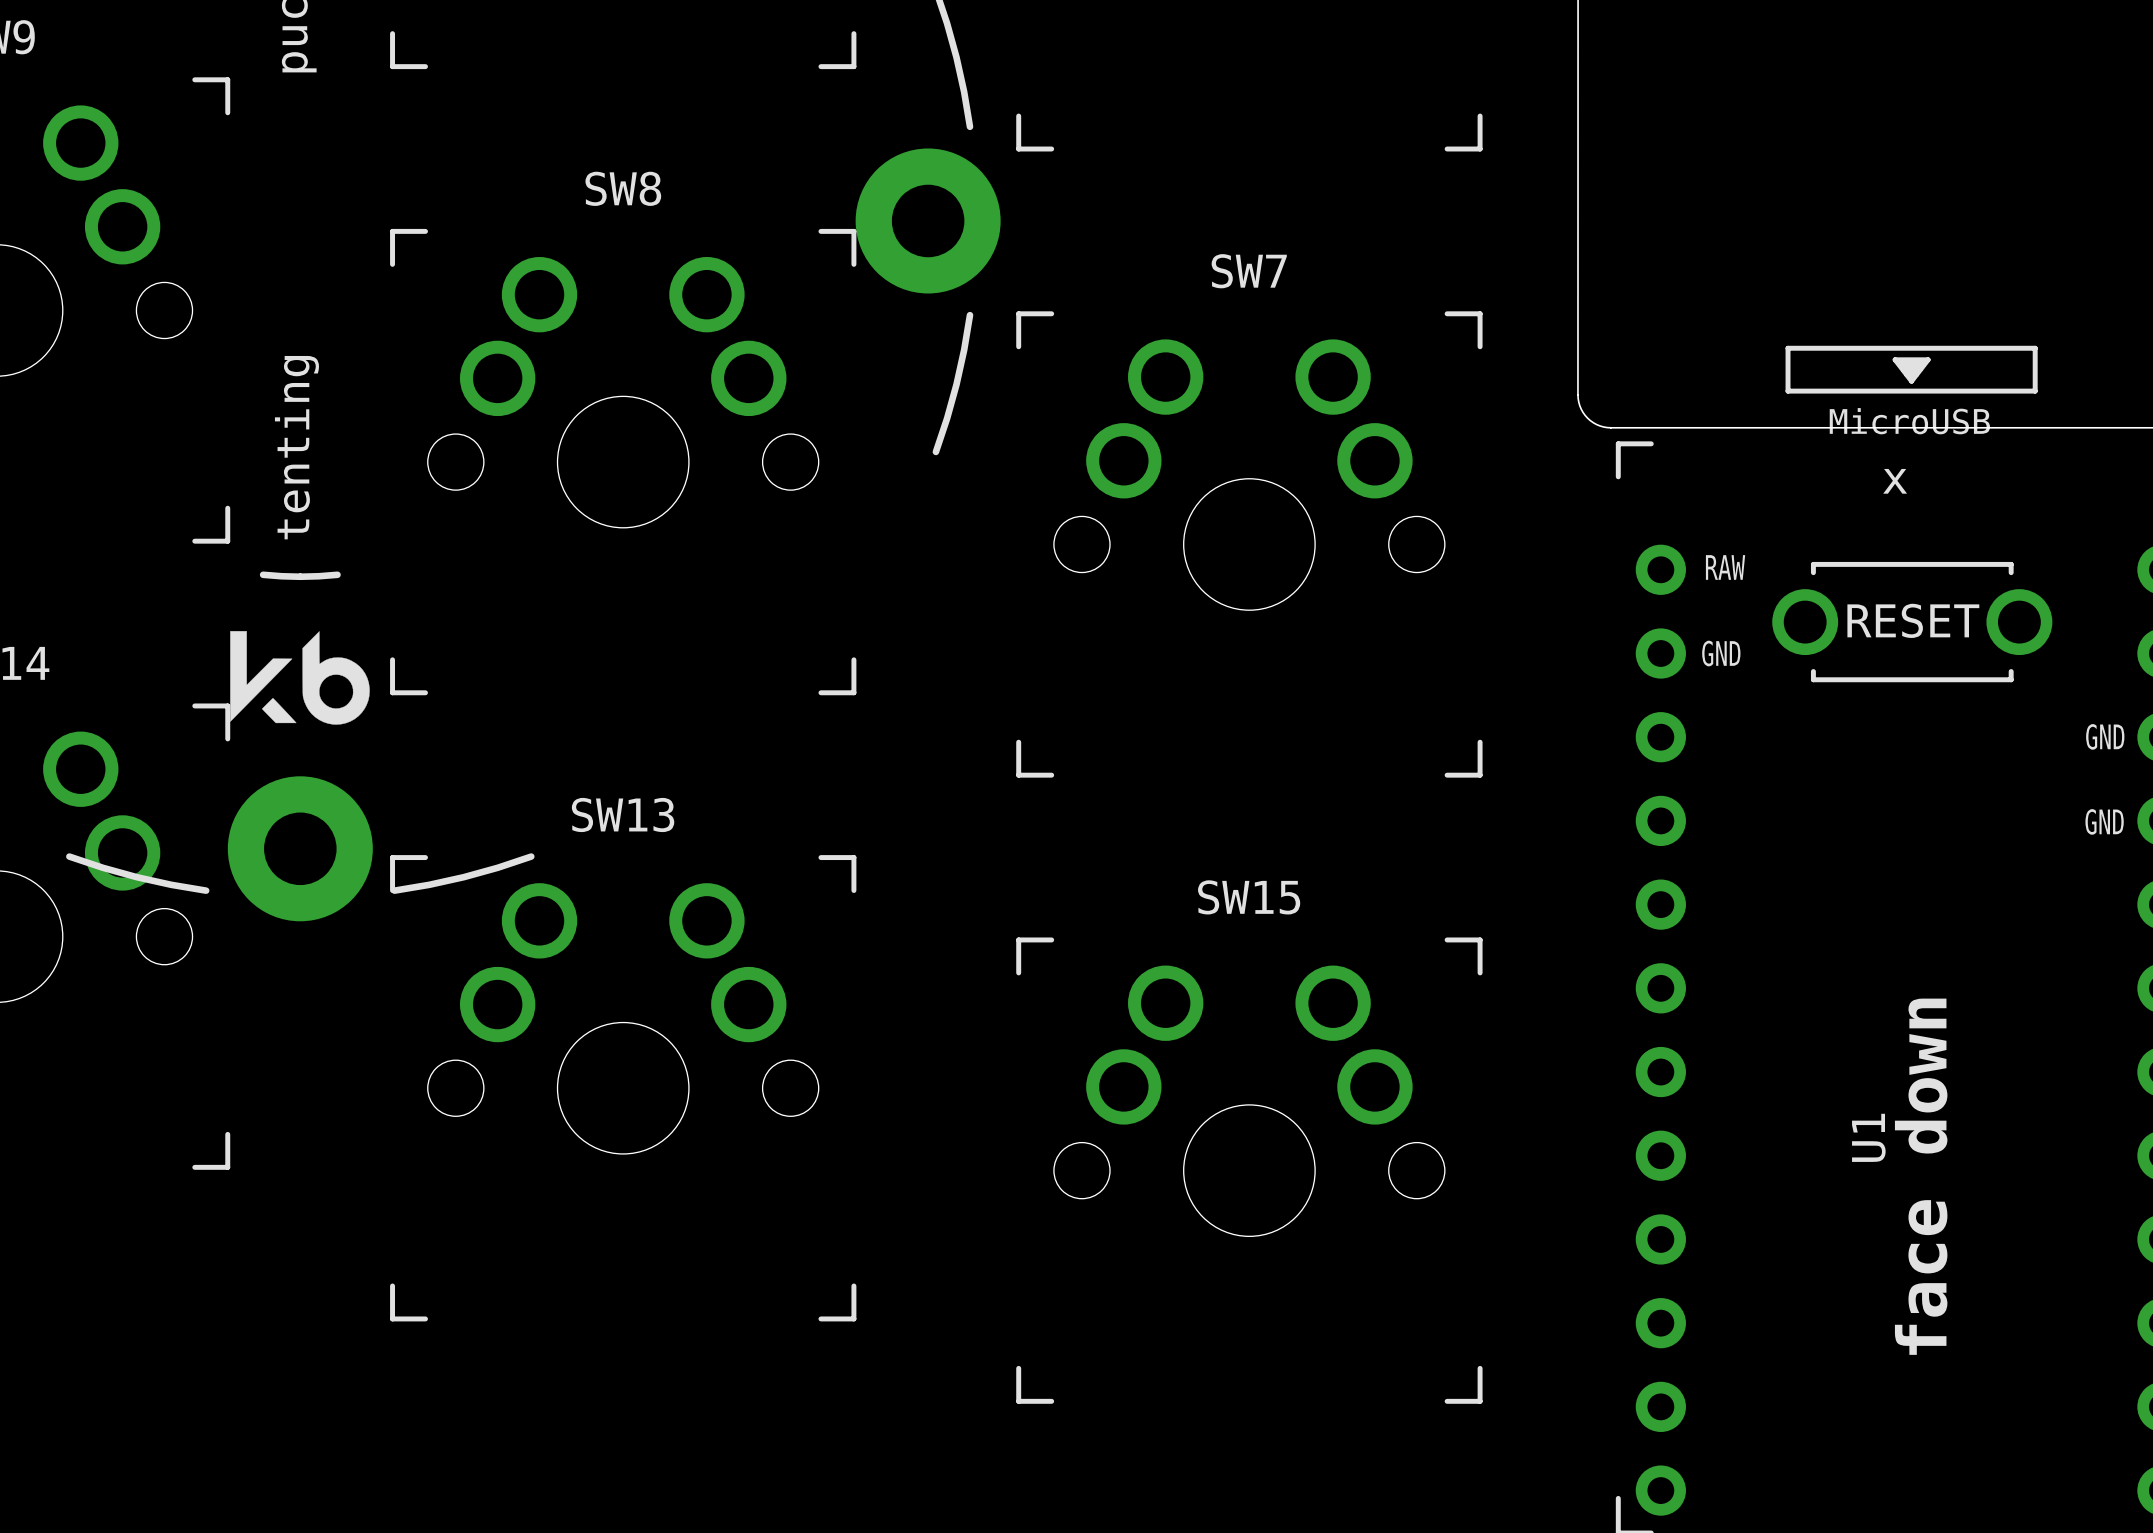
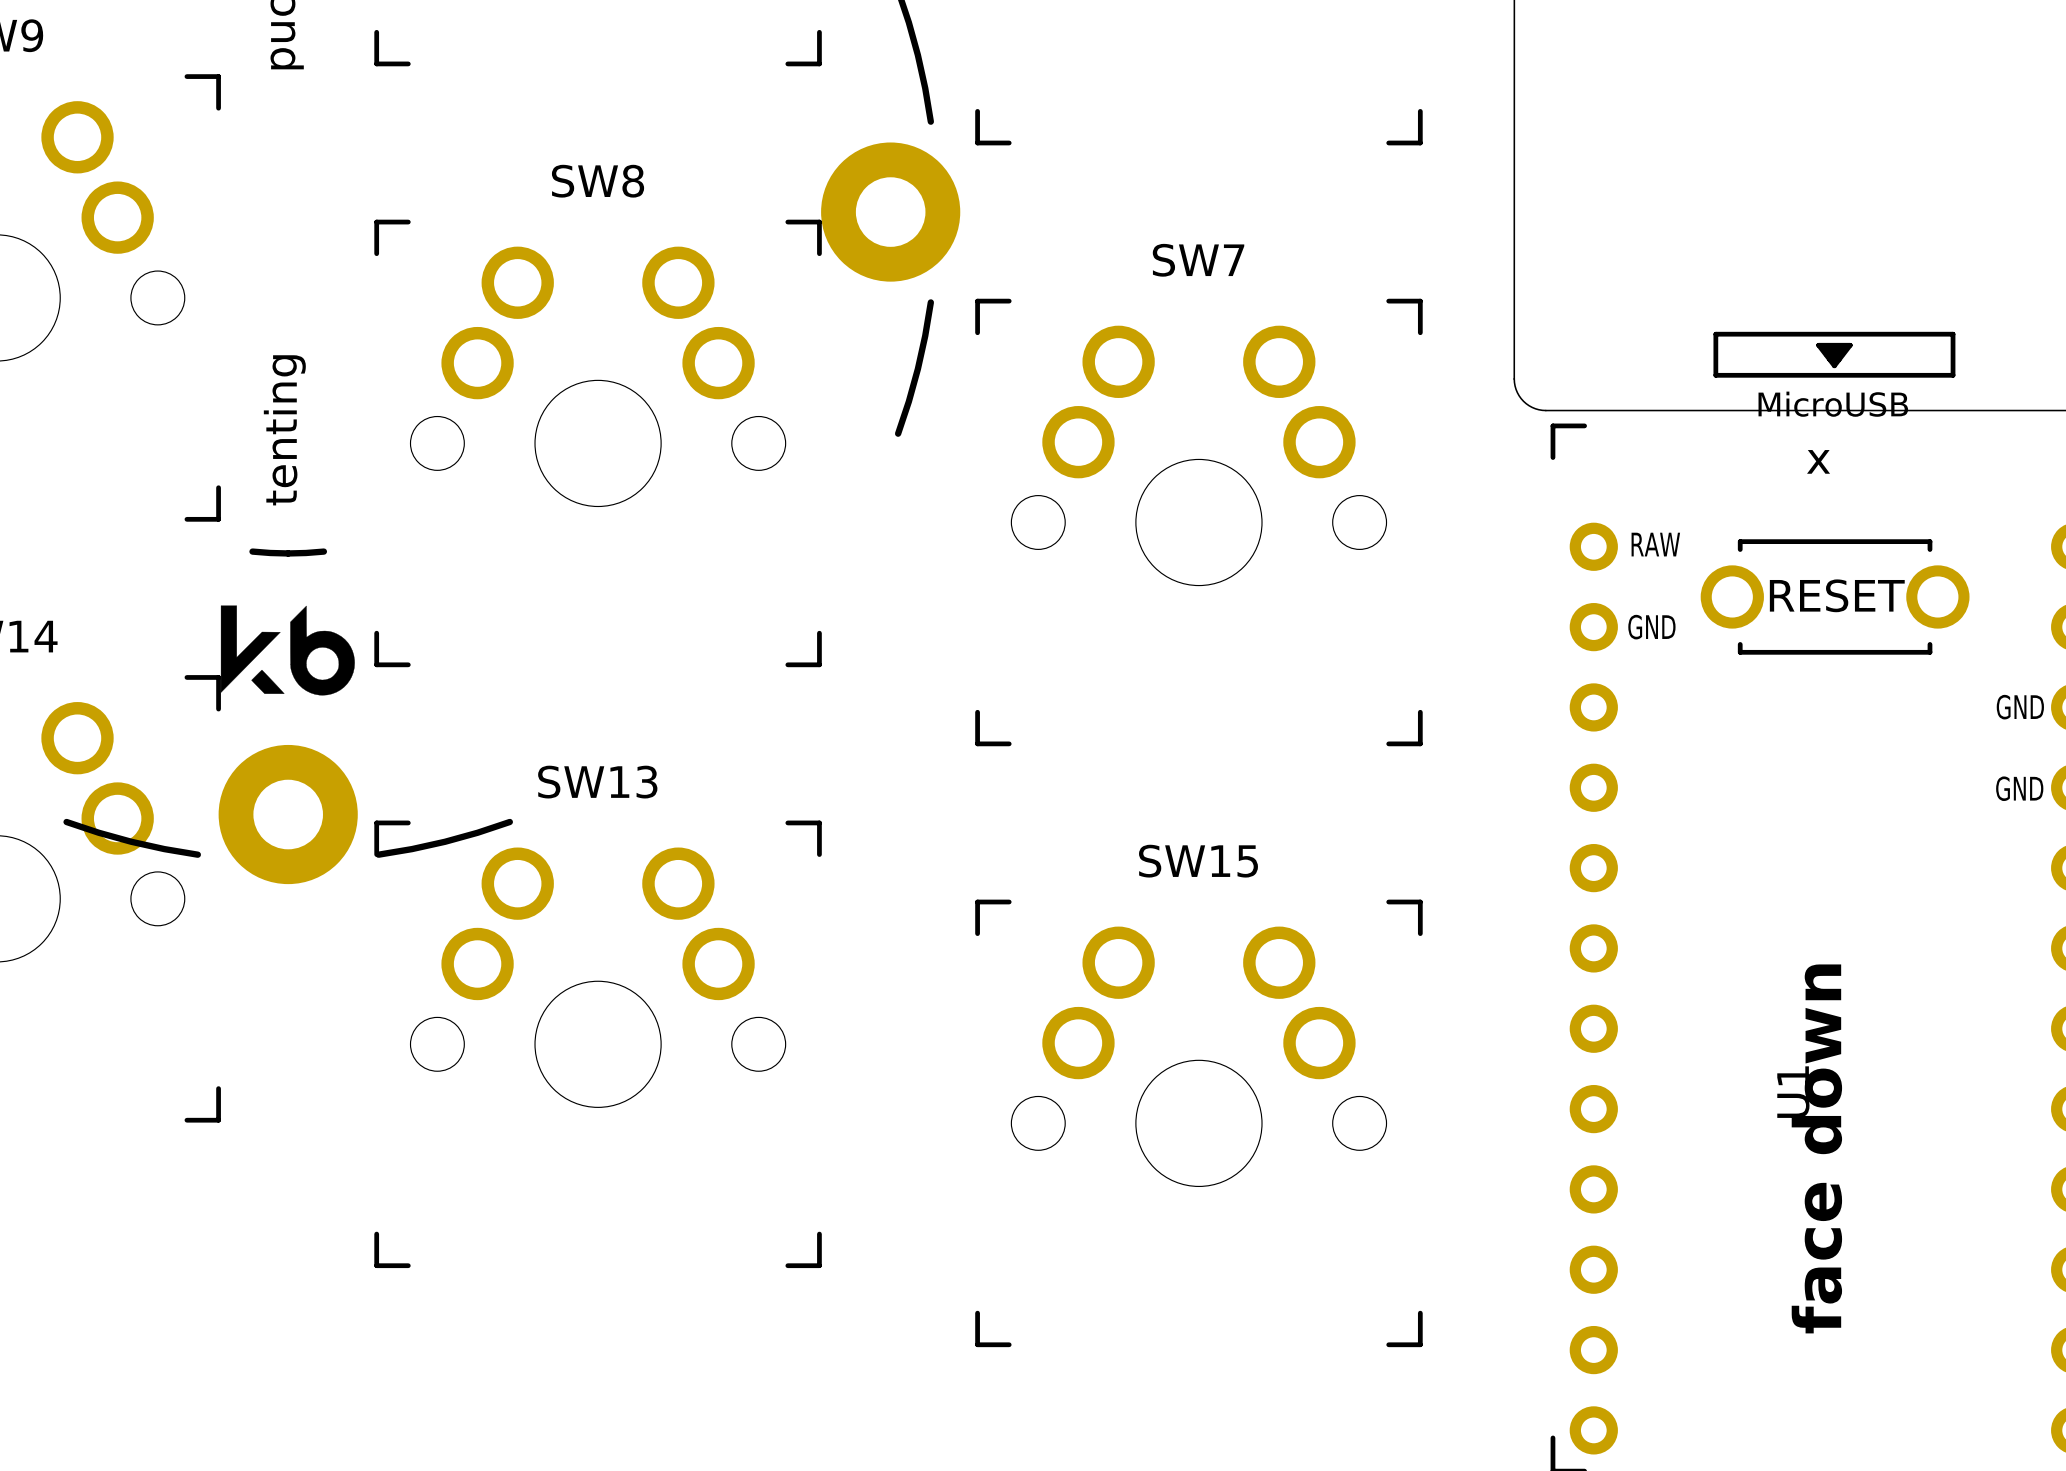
text position: face down (1921, 1176) -> face down (1816, 1148)

